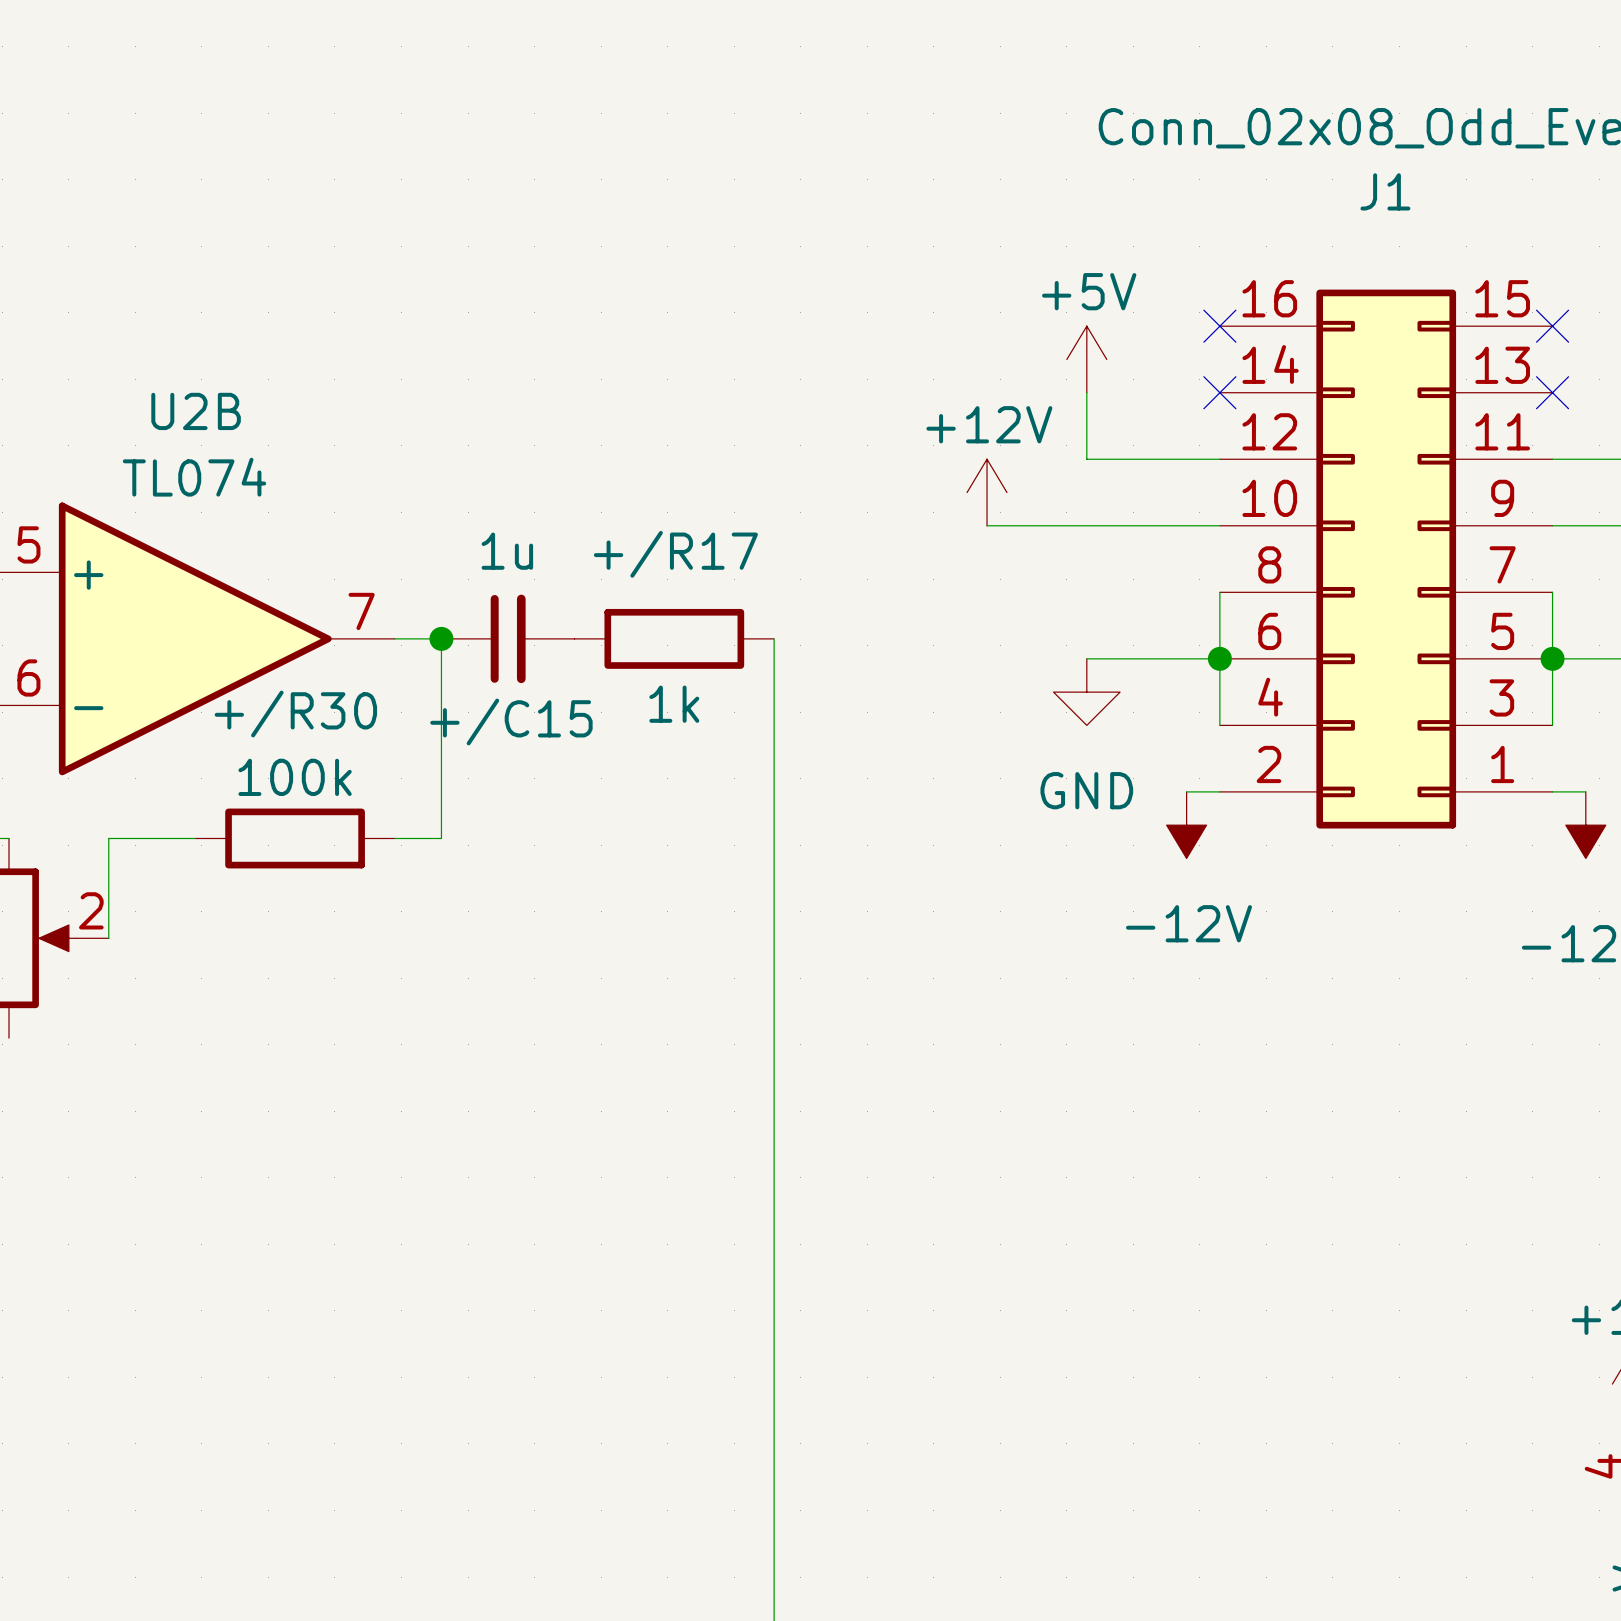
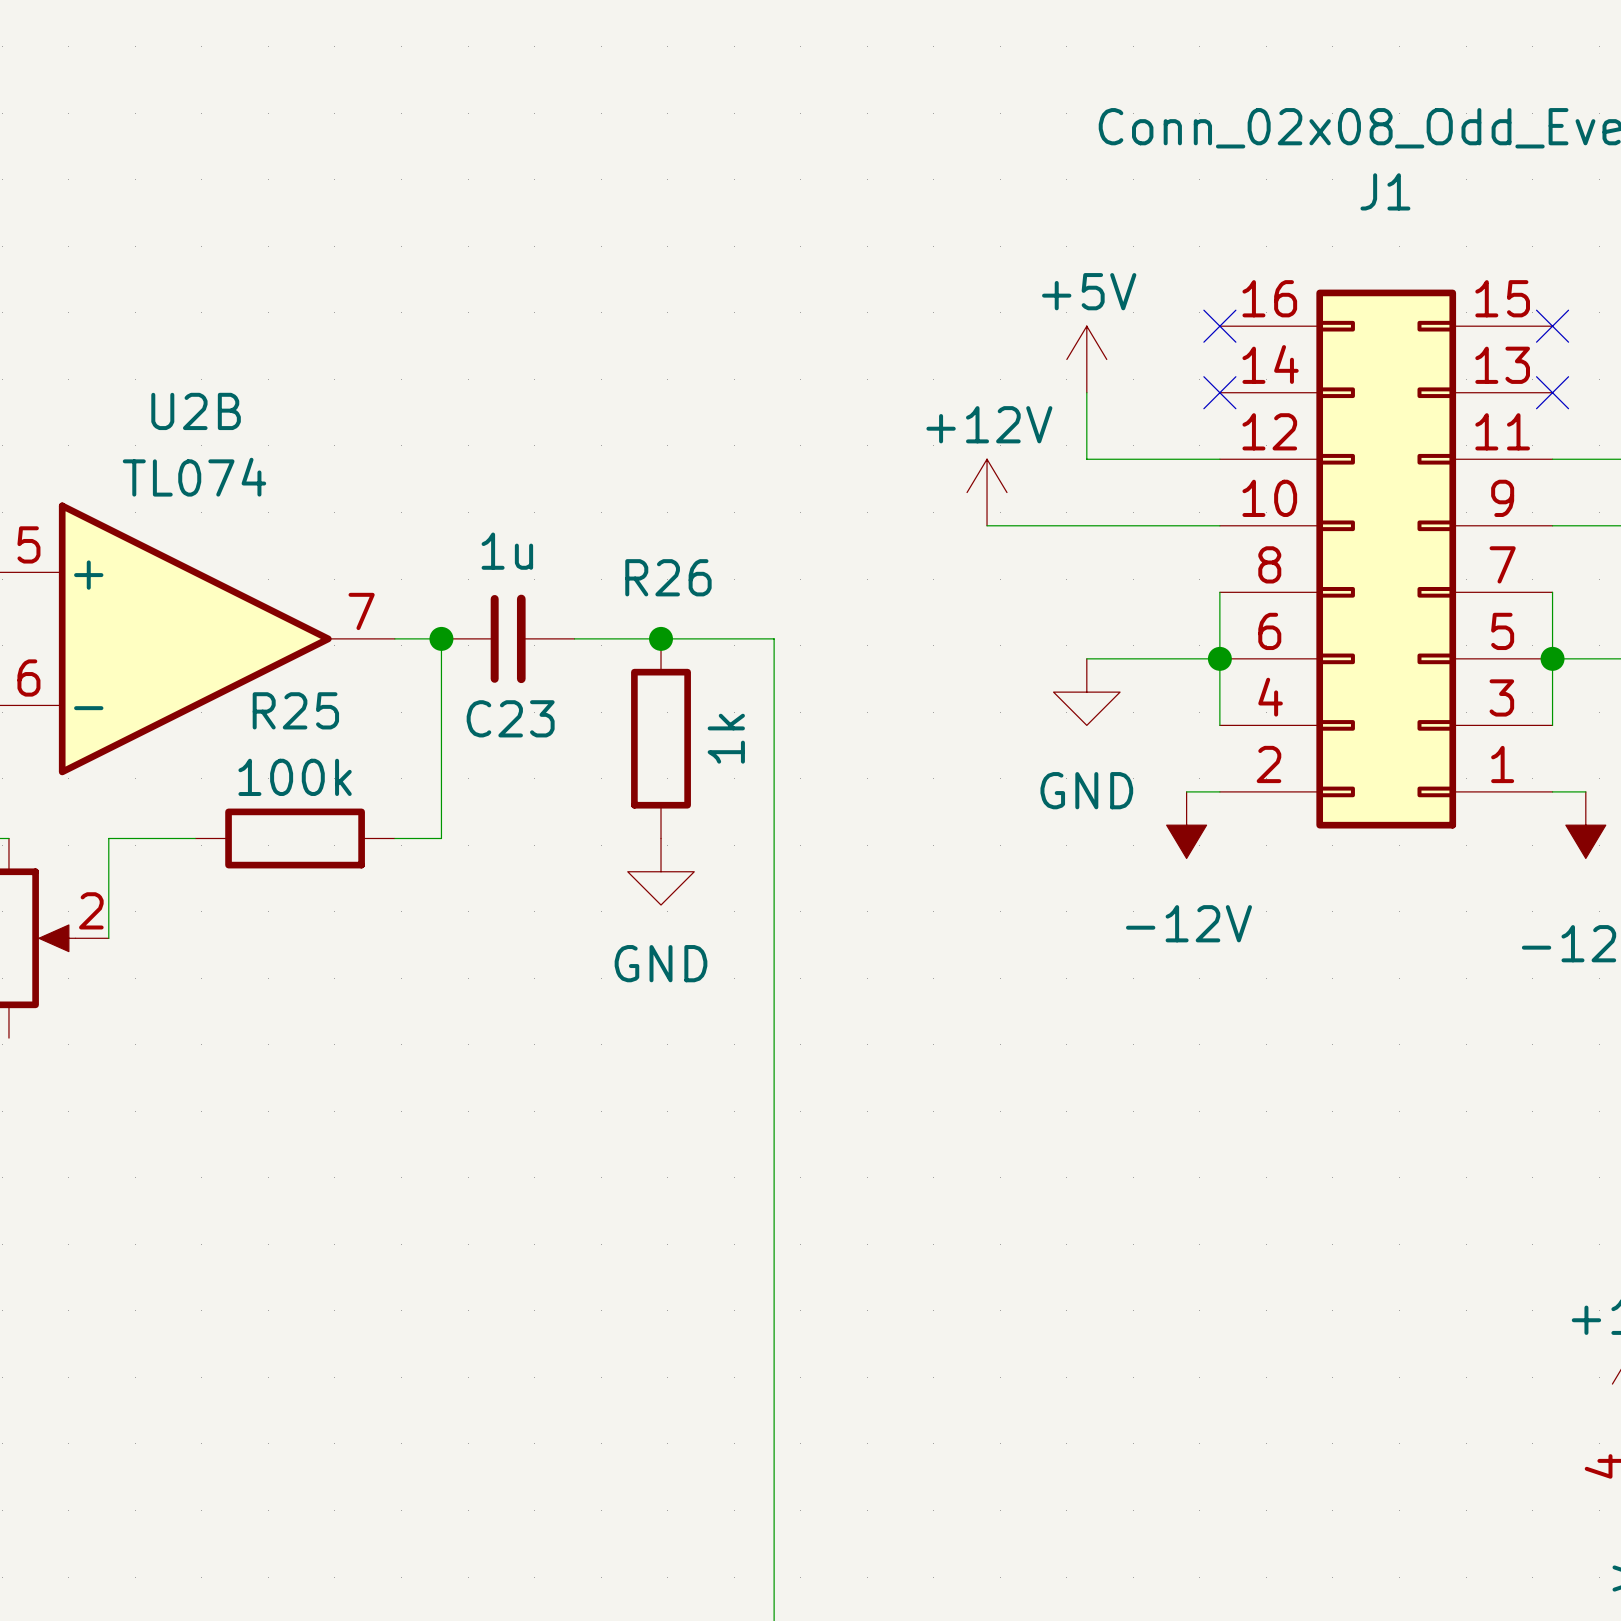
wire: none -> (574, 638) (774, 638)
junction: none -> (661, 638)
+/R17: 1k (674, 638) -> none
+/R30 name: +/R30 (295, 714) -> R25 (295, 710)
+/C15 name: +/C15 (511, 721) -> C23 (510, 718)
R26: none -> 1k (661, 738)
power symbol: none -> GND (661, 871)

